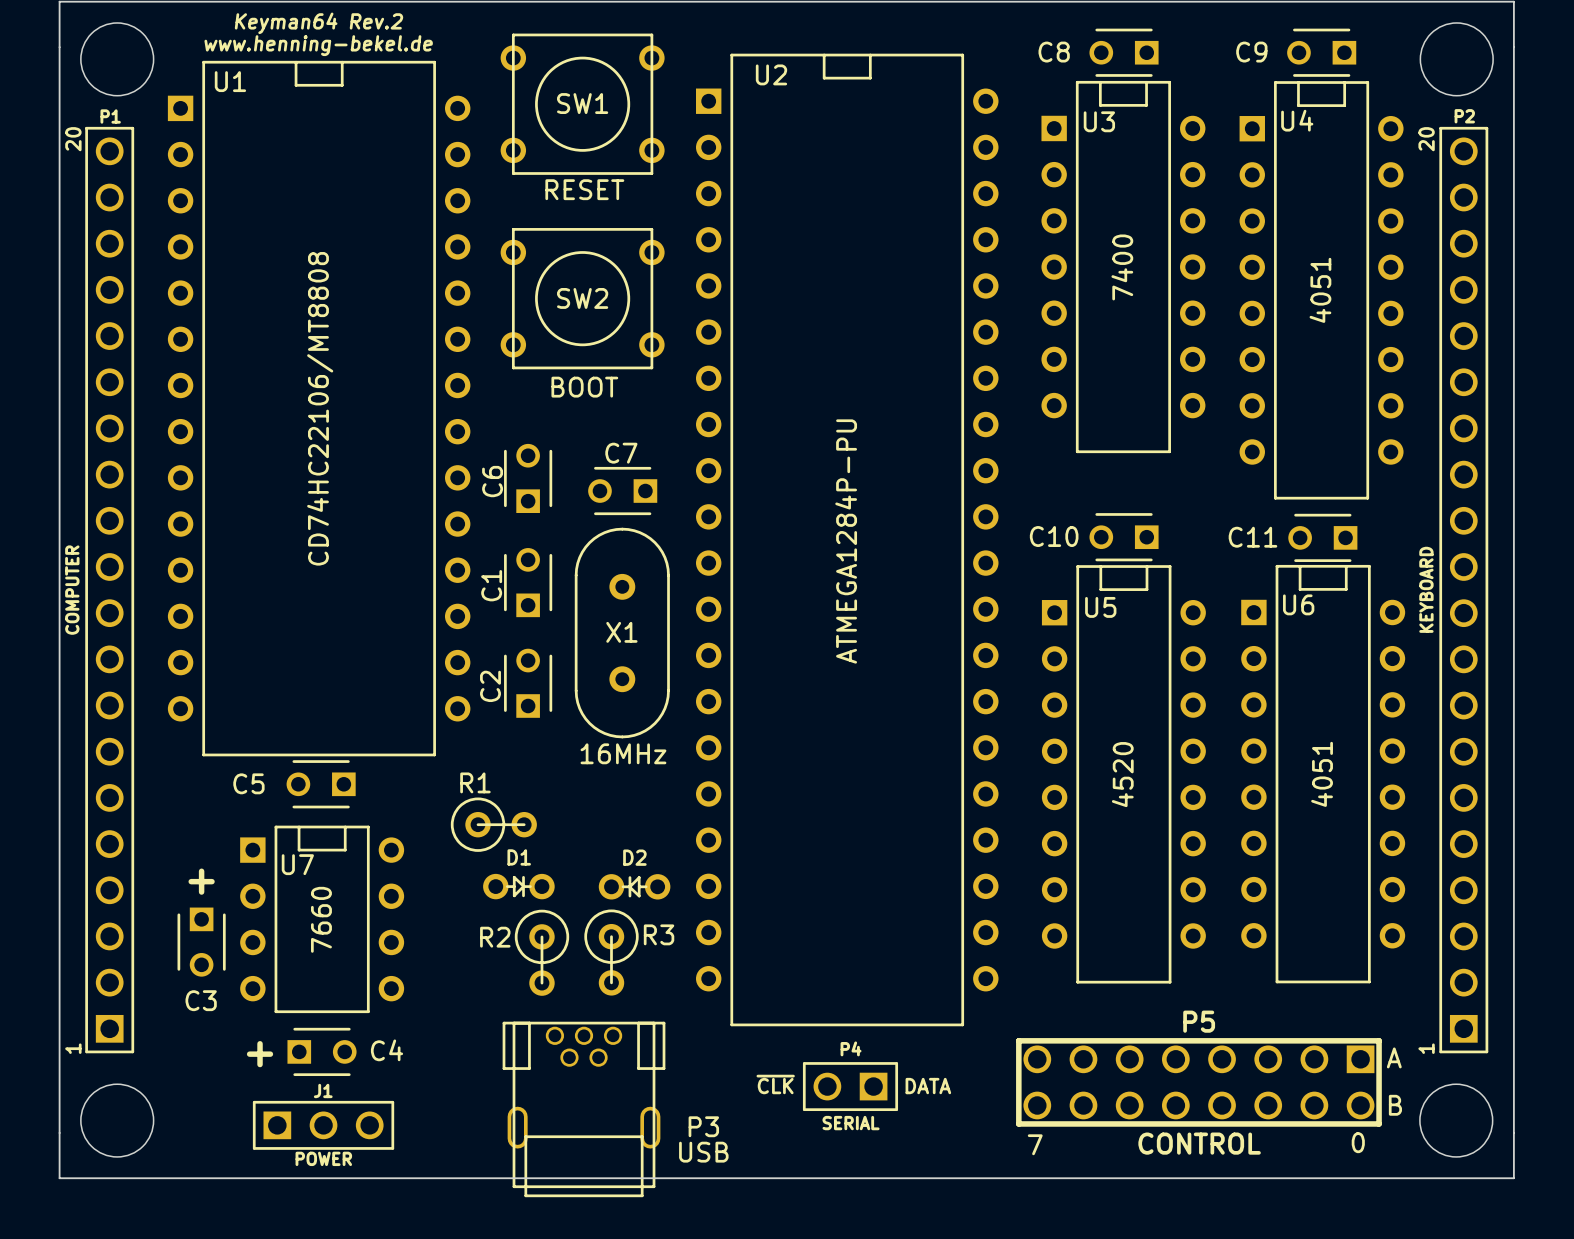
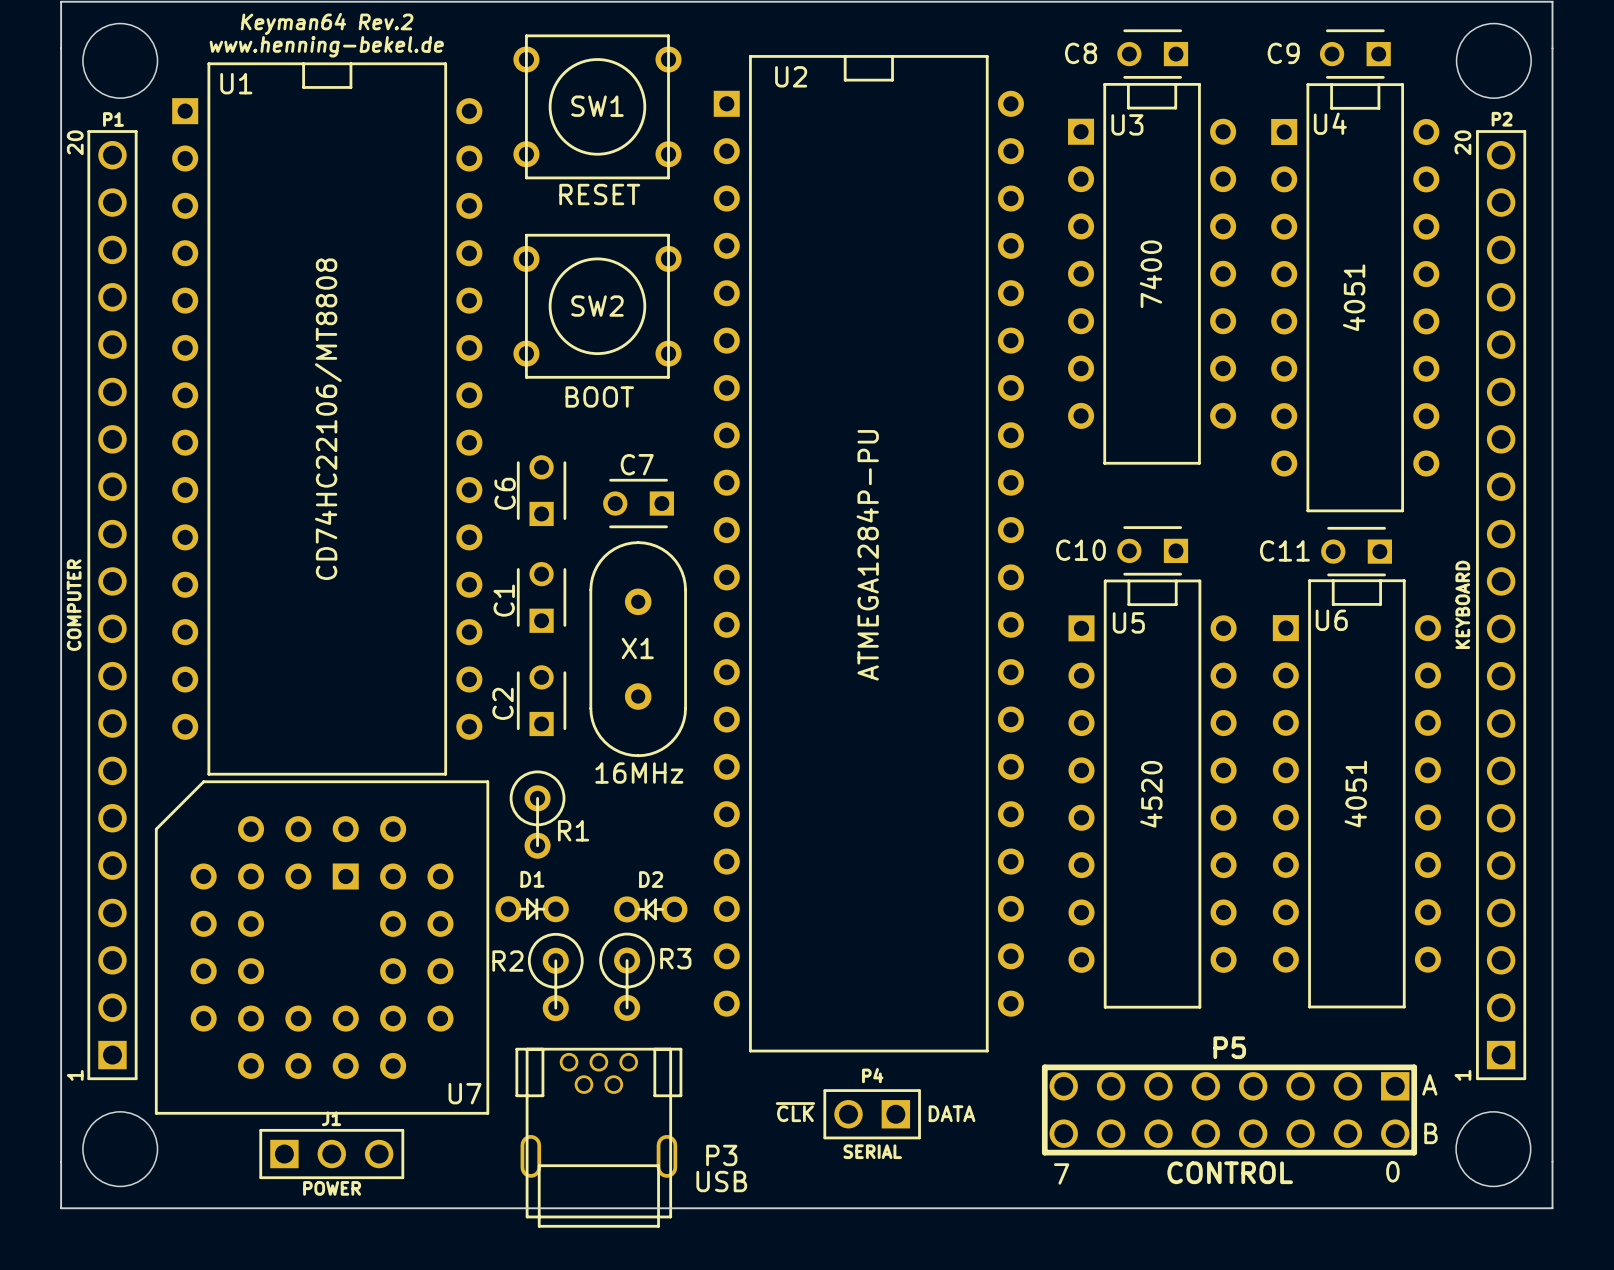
C5: (321, 784) -> none
R1 rotation: 0° (493, 824) -> 90° clockwise (537, 814)
U7 footprint: [240, 825, 405, 1014] -> [154, 780, 490, 1115]
U7 name position: U7 (297, 864) -> U7 (465, 1093)
text: + (201, 881) -> none
U7 value: 7660 (321, 919) -> none
C3: (201, 942) -> none
C4: (322, 1051) -> none
text: + (260, 1054) -> none

